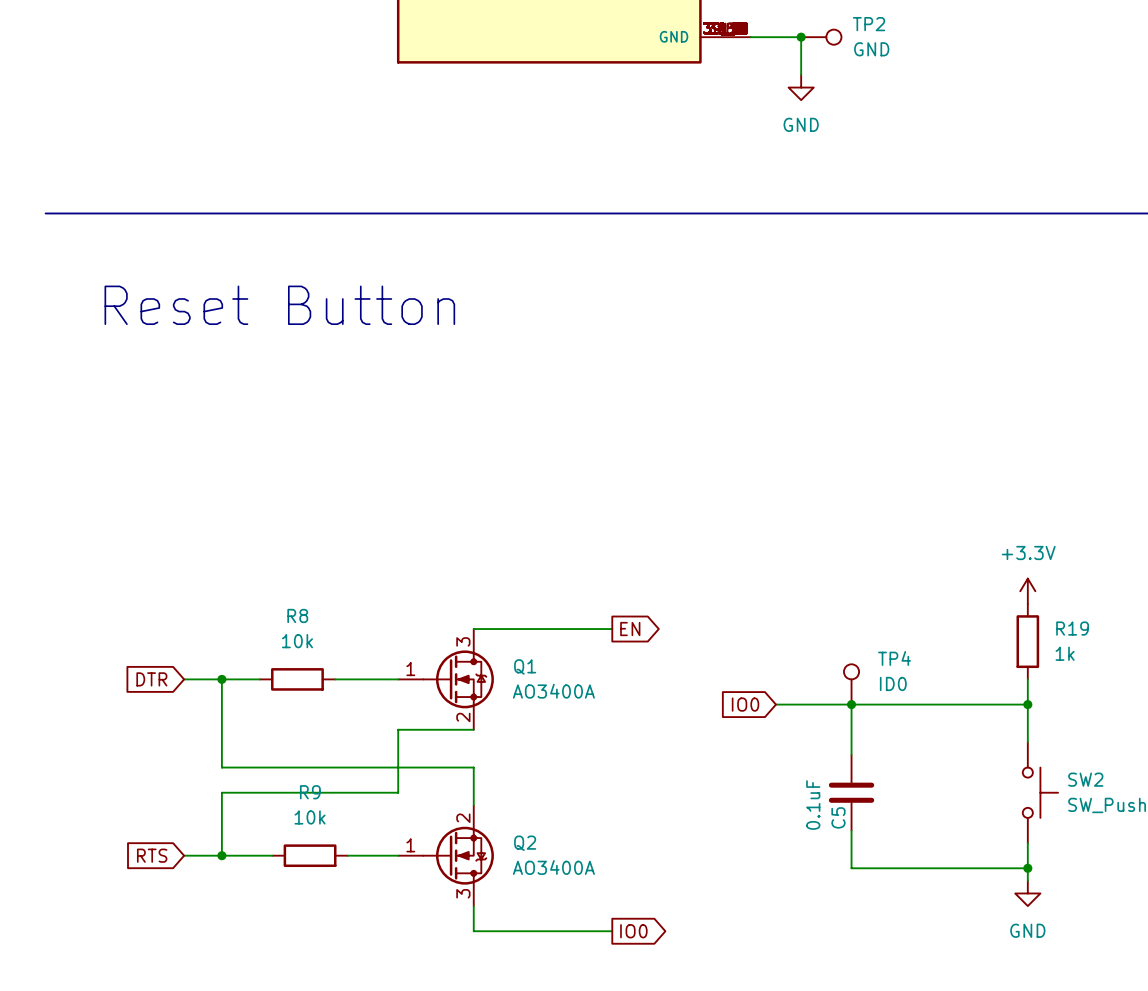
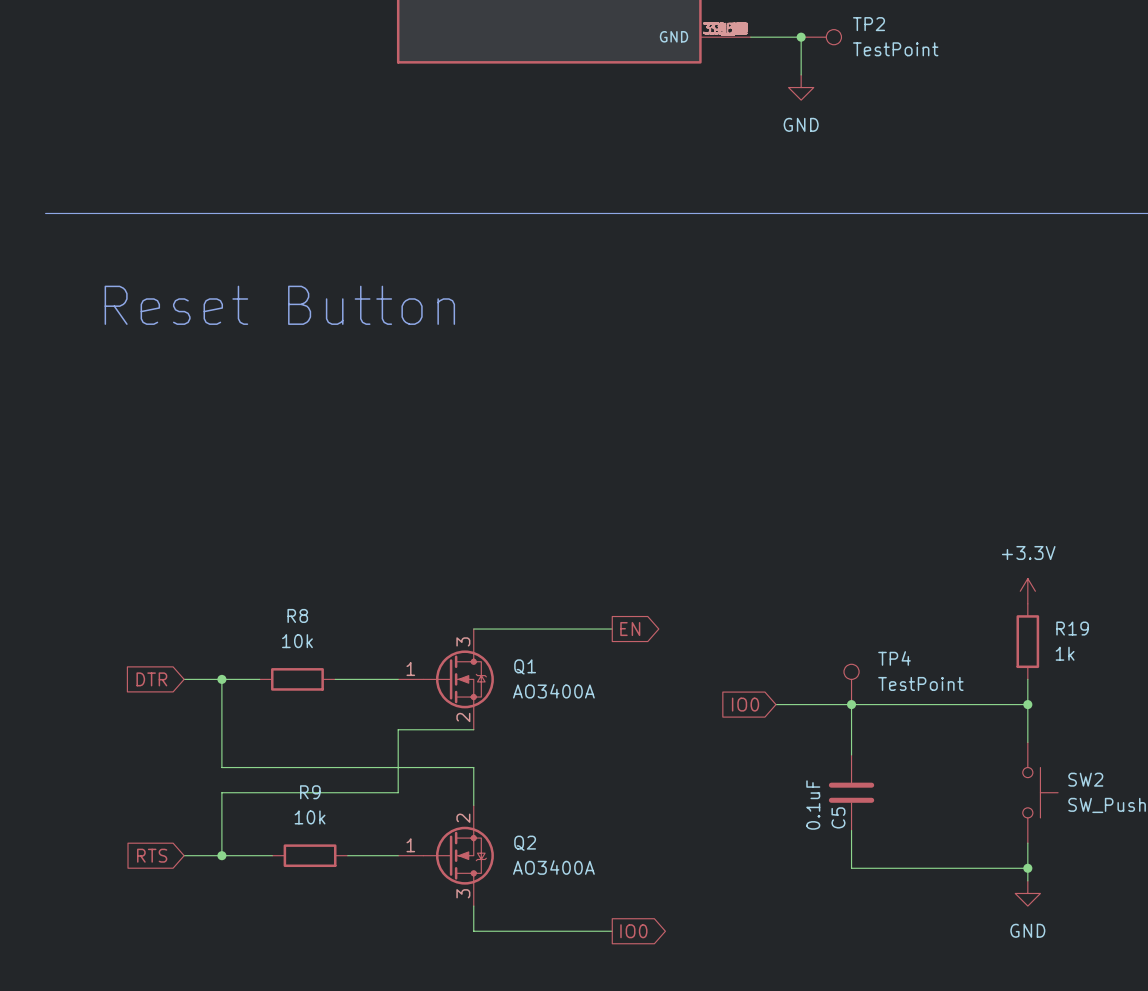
TP2 value: GND (871, 49) -> TestPoint (895, 49)
TP4 value: ID0 (893, 683) -> TestPoint (920, 683)

